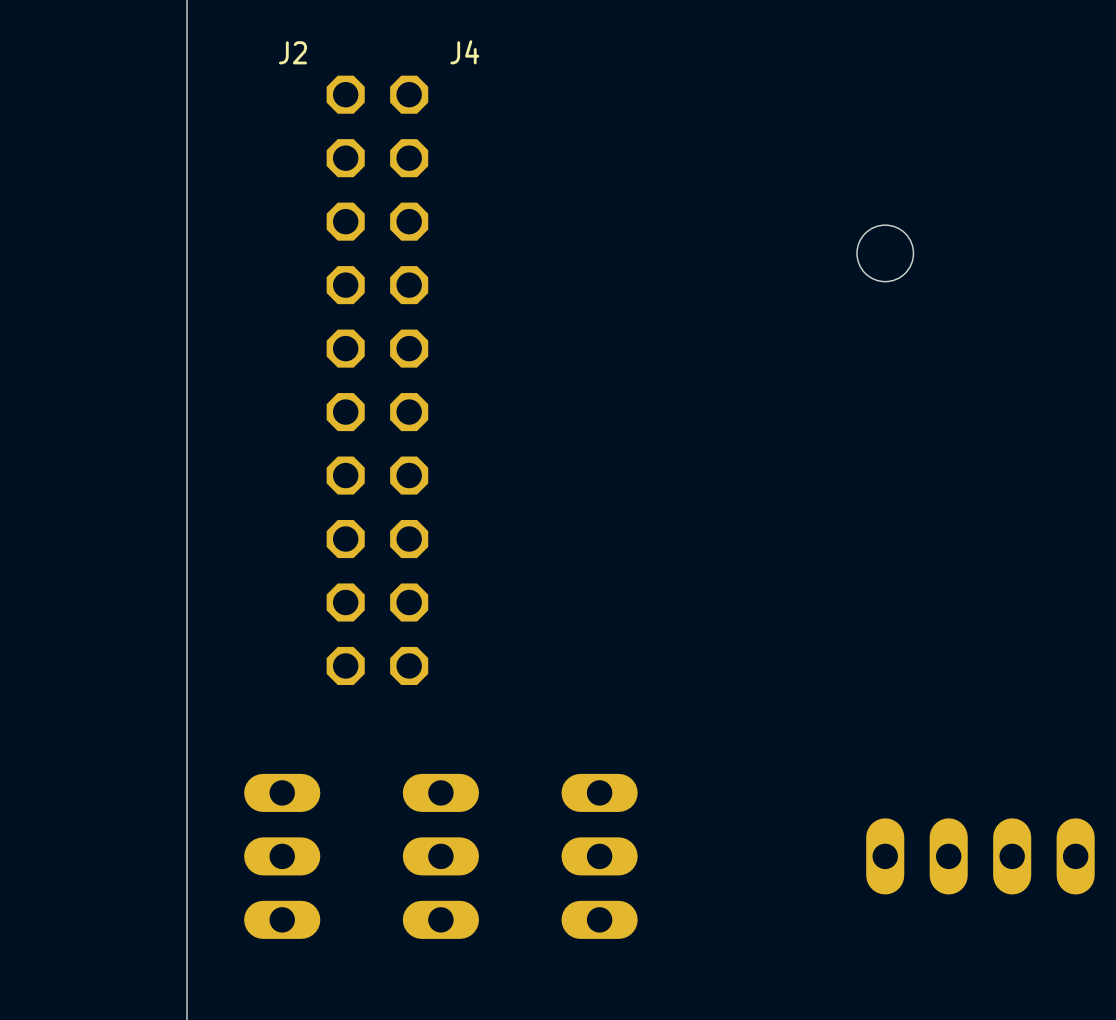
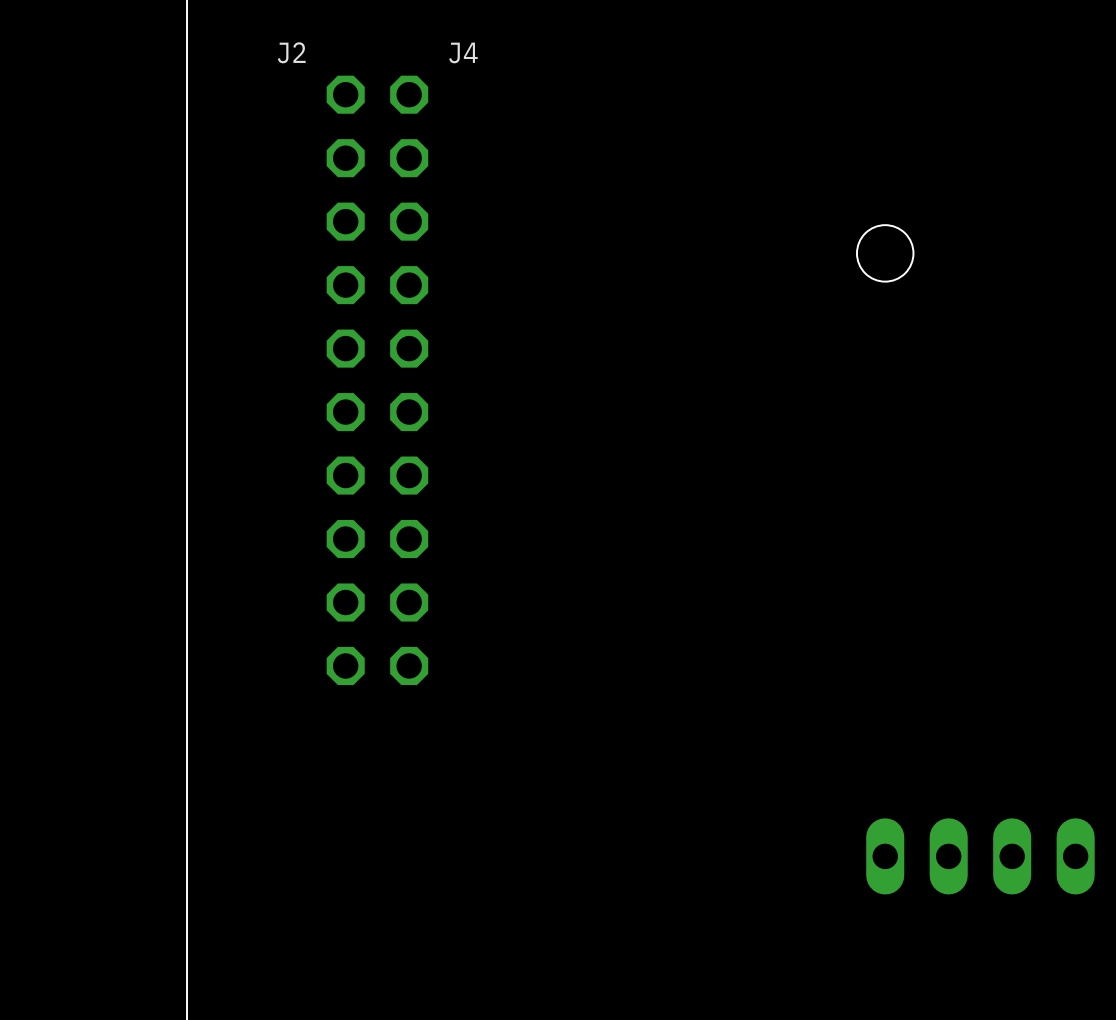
part: (282, 856) -> none
part: (440, 856) -> none
part: (599, 856) -> none

